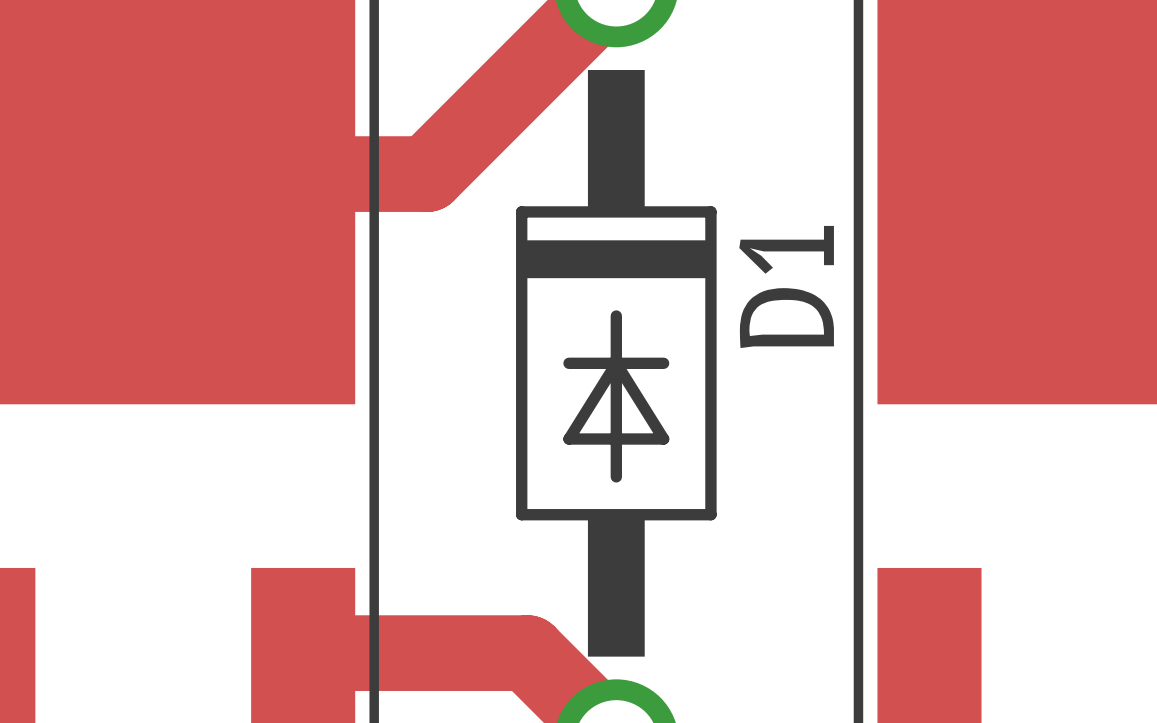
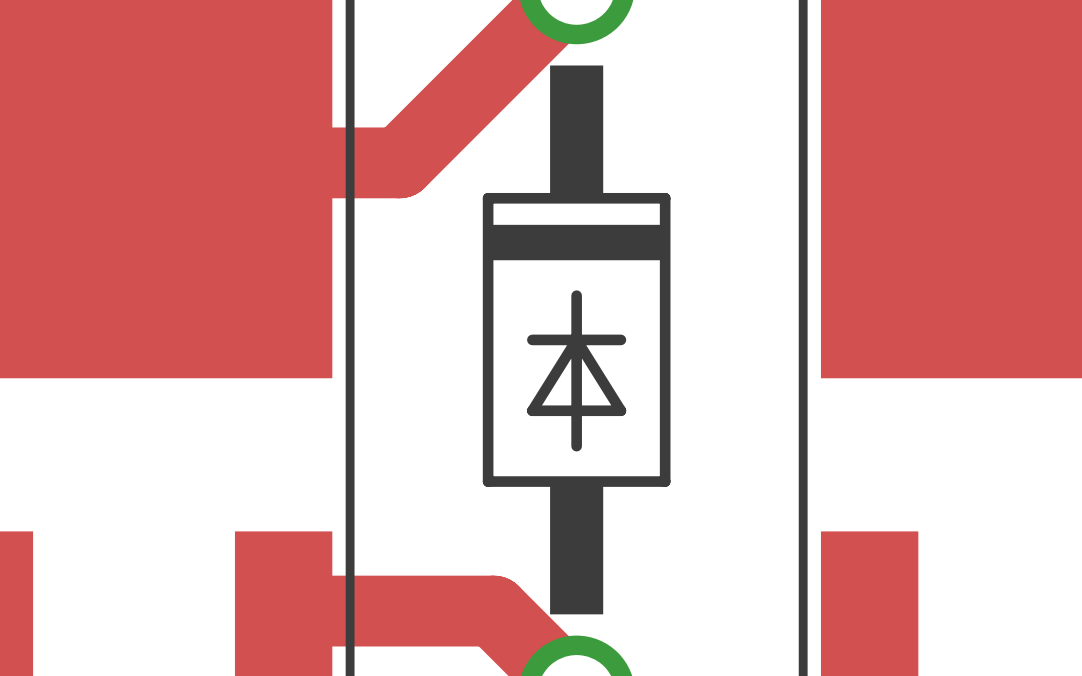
D1 name: D1 (786, 287) -> none

